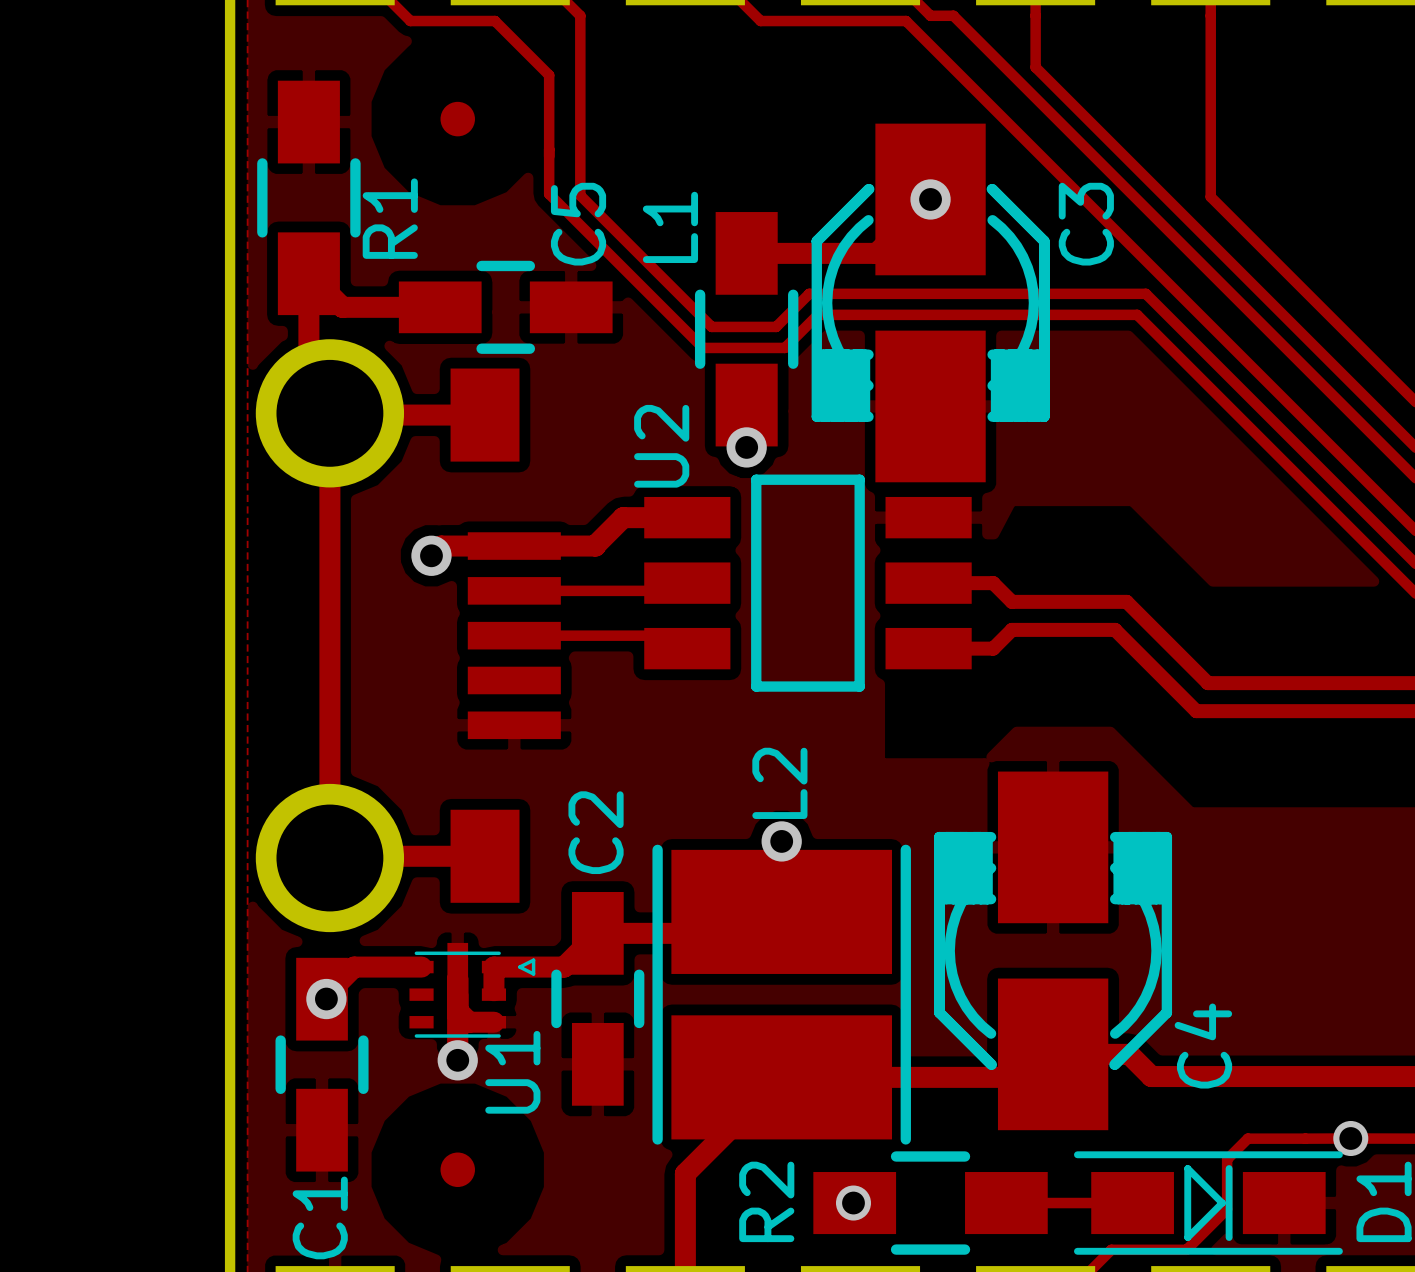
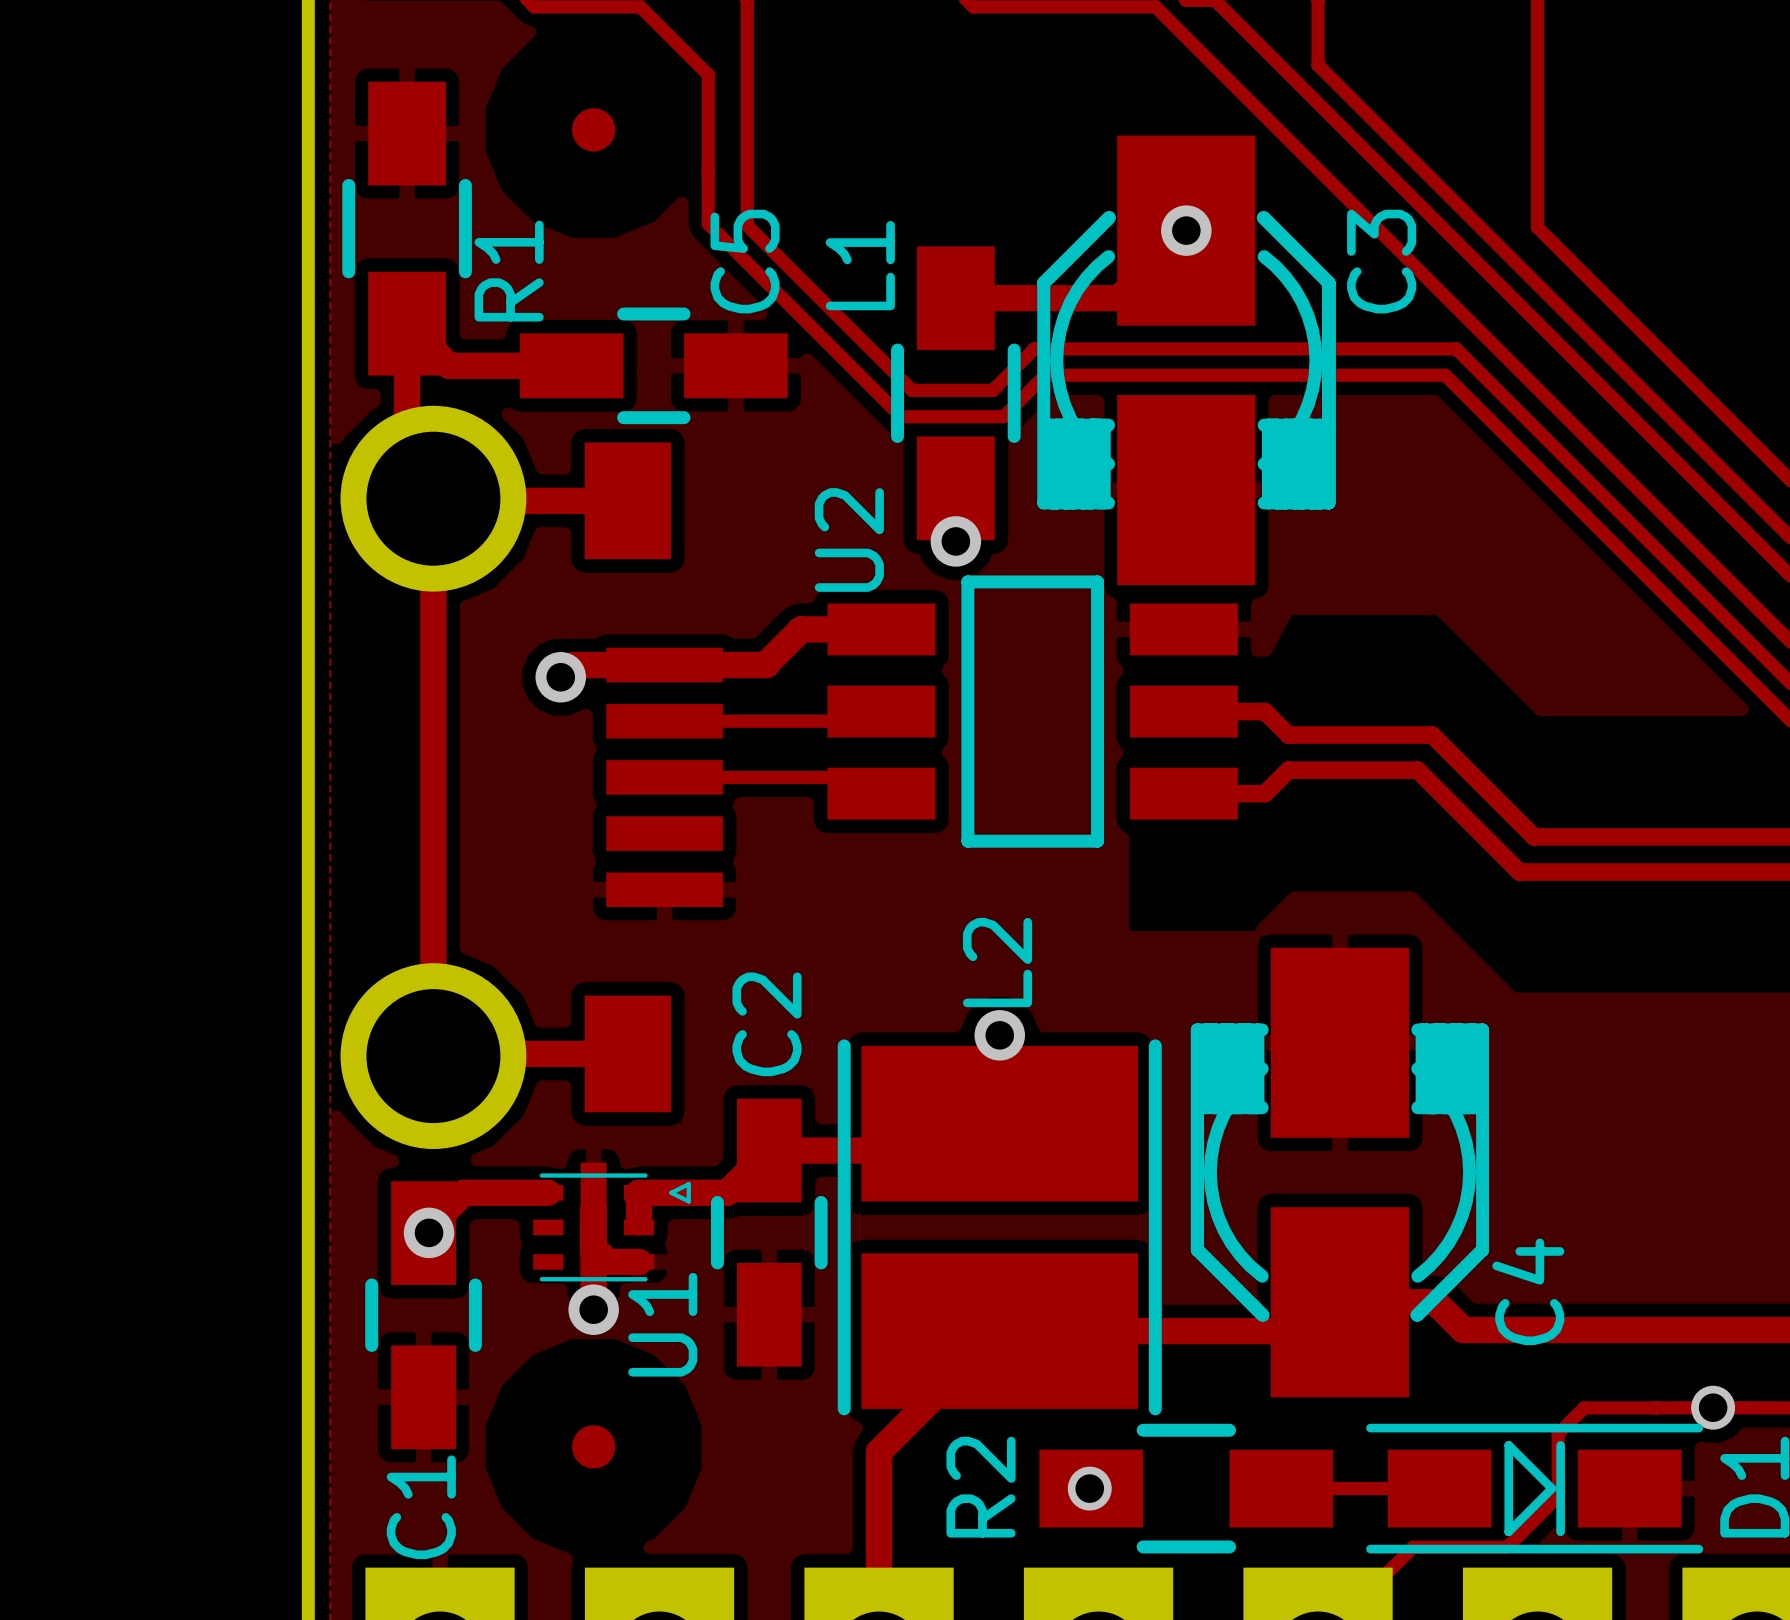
R1 name position: R1 (390, 218) -> R1 (509, 271)

